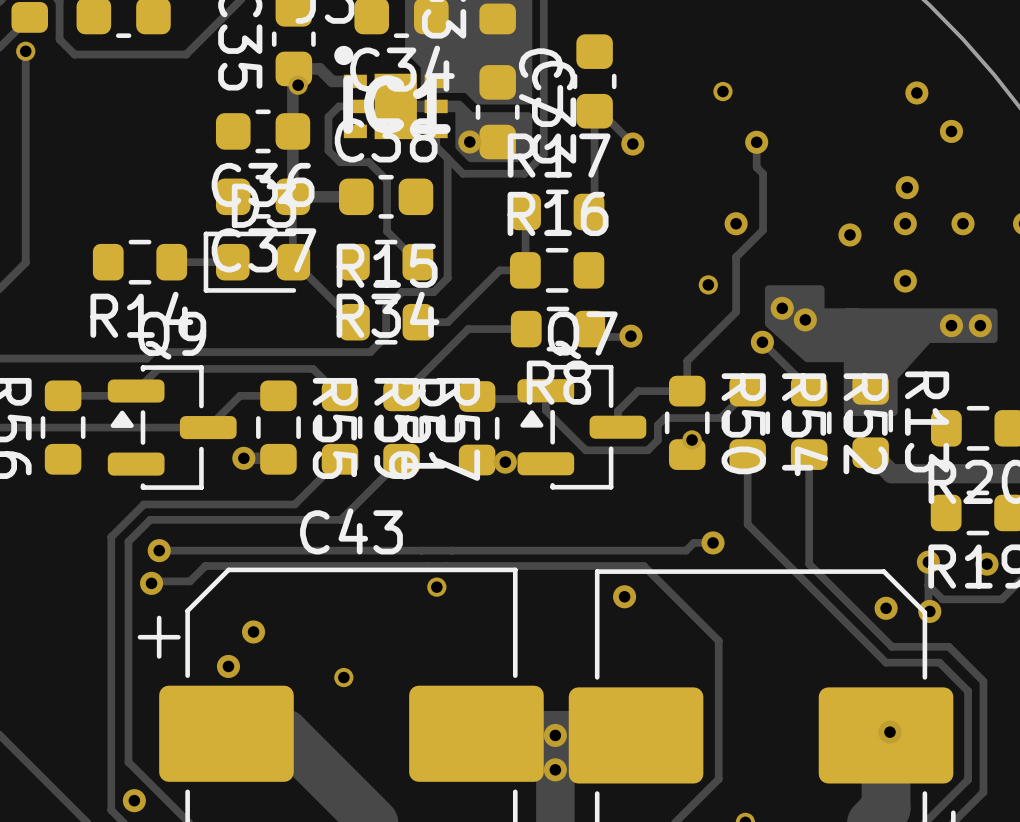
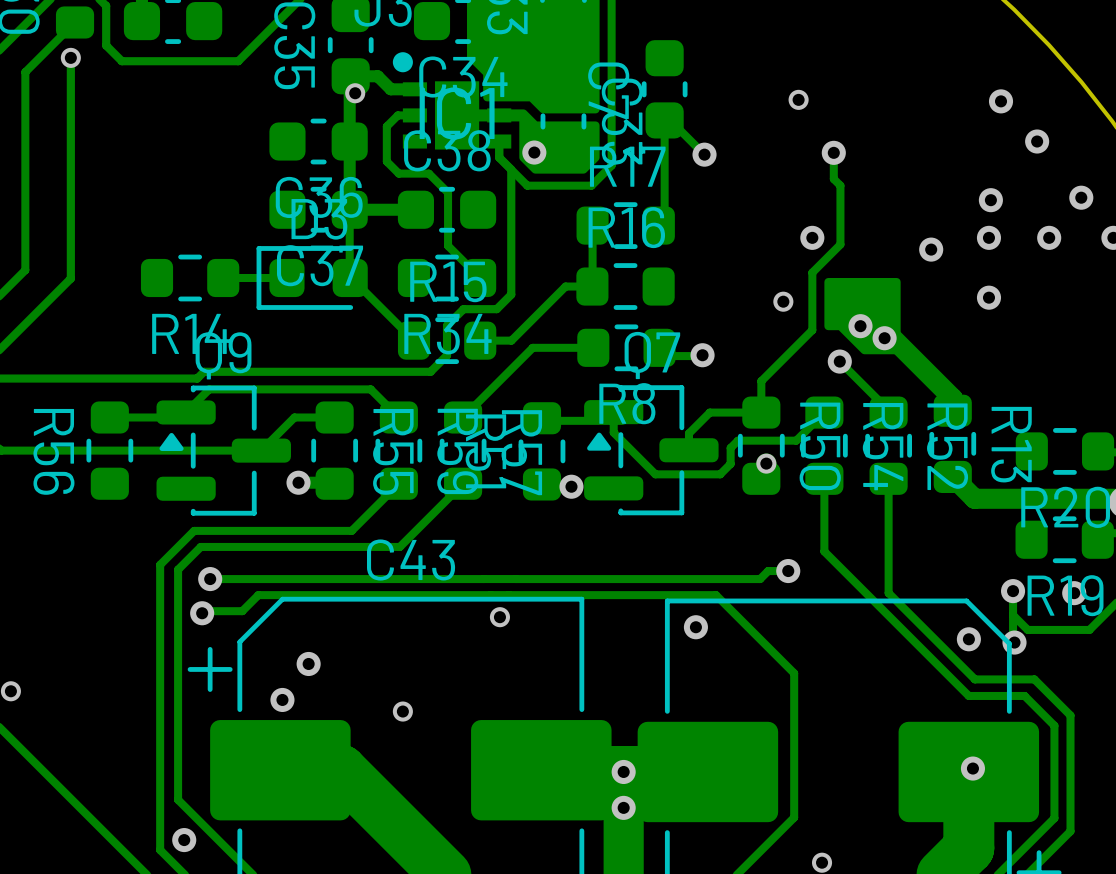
via: none -> (1081, 197)
drawing shape: [764, 285, 862, 363] -> [824, 277, 901, 355]
track: none -> (860, 306) (952, 398)
drawing: [843, 308, 998, 417] -> none
via: (951, 325) -> none
via: (980, 325) -> none

